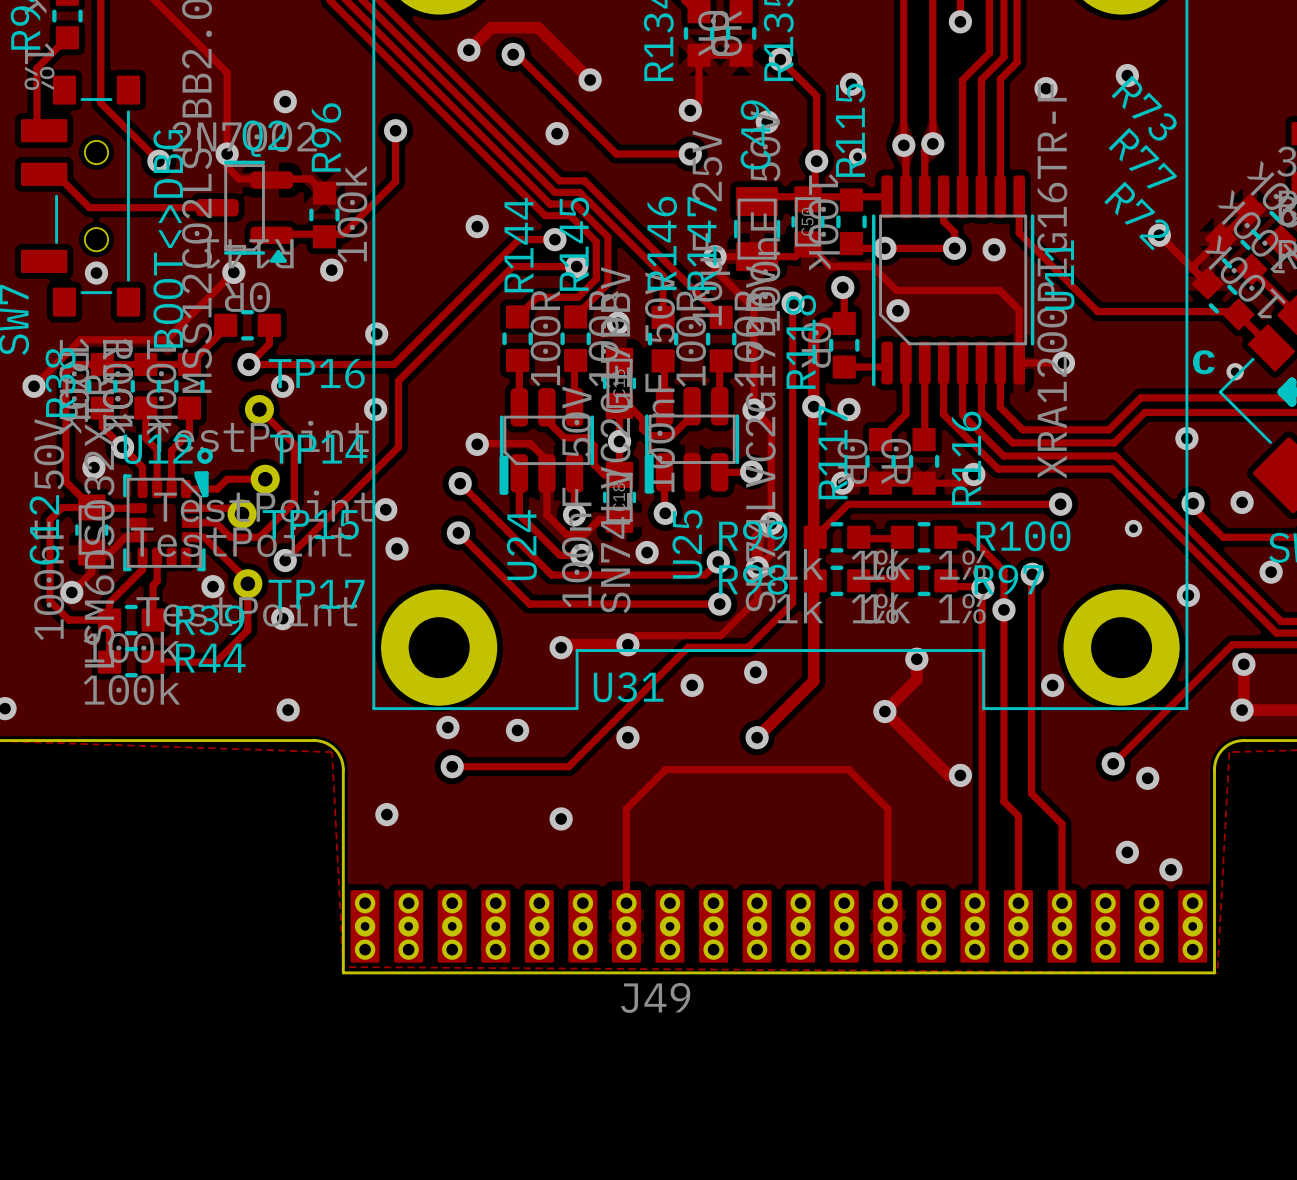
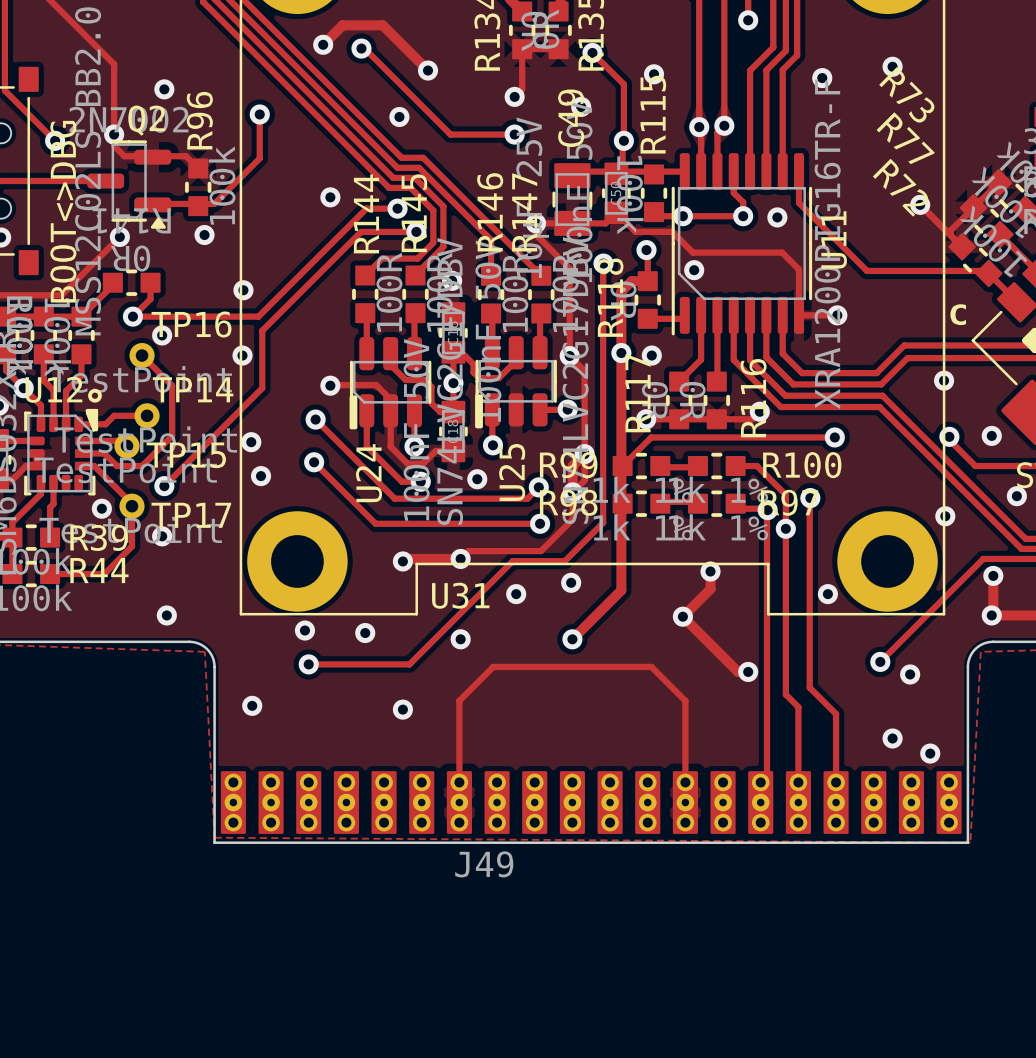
via: (857, 156) -> none
via: (1235, 371) -> none
via: (1133, 528) -> none

